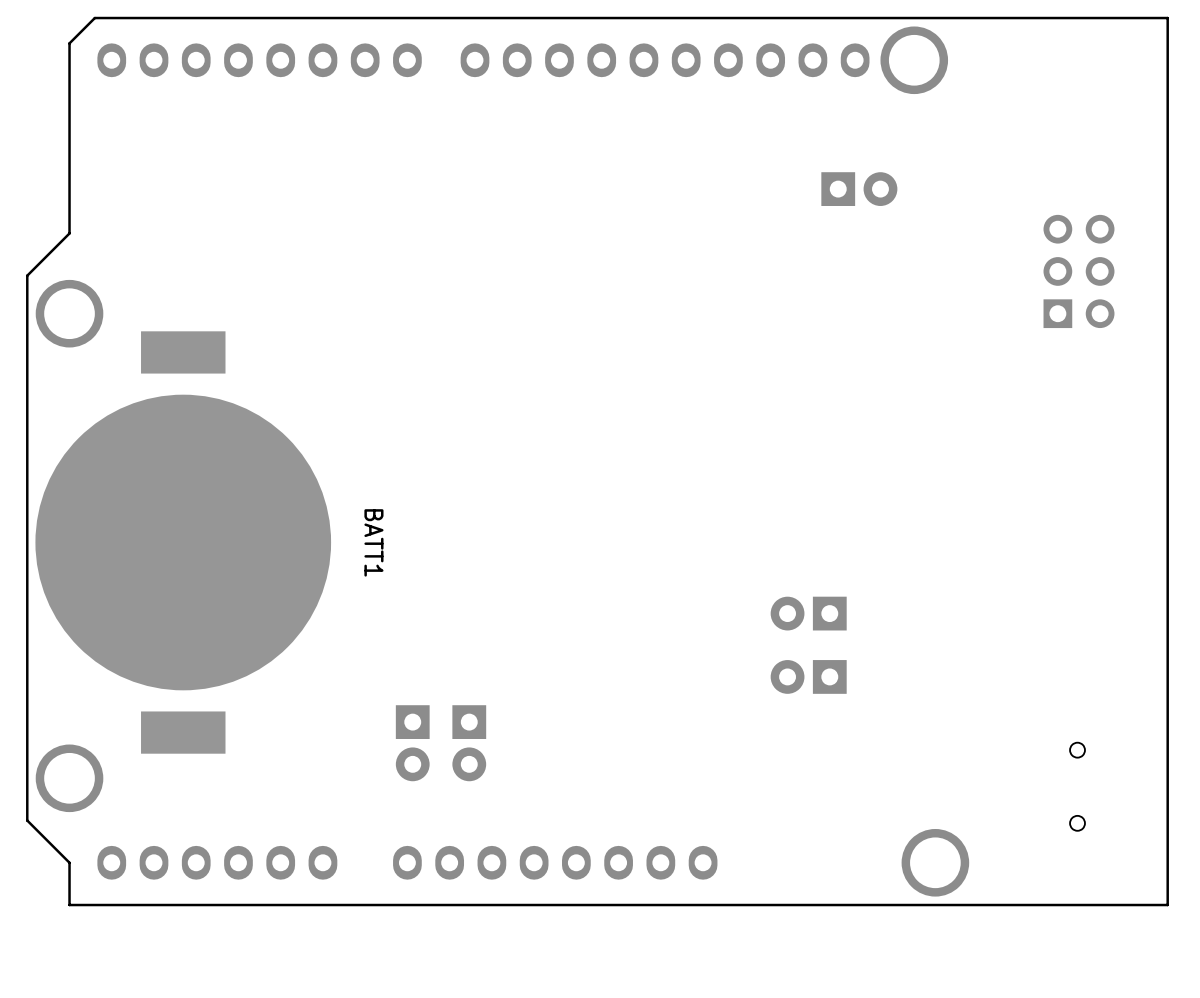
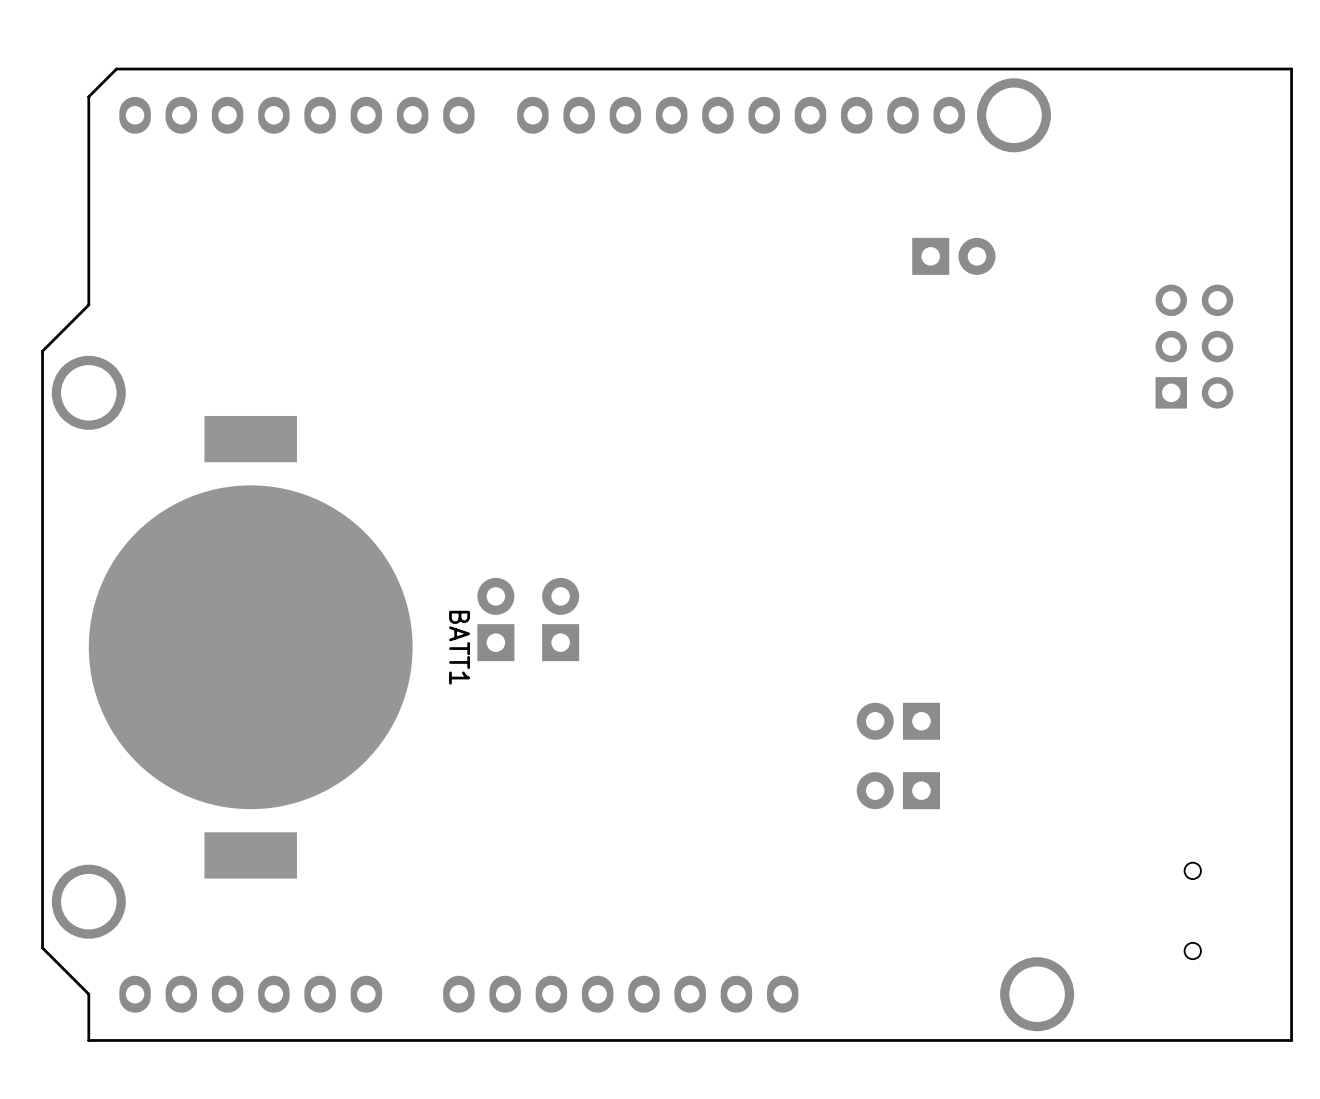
part: none -> (495, 619)
part: none -> (560, 619)
BATT1 position: (183, 542) -> (250, 647)
part: (412, 743) -> none
part: (469, 743) -> none

